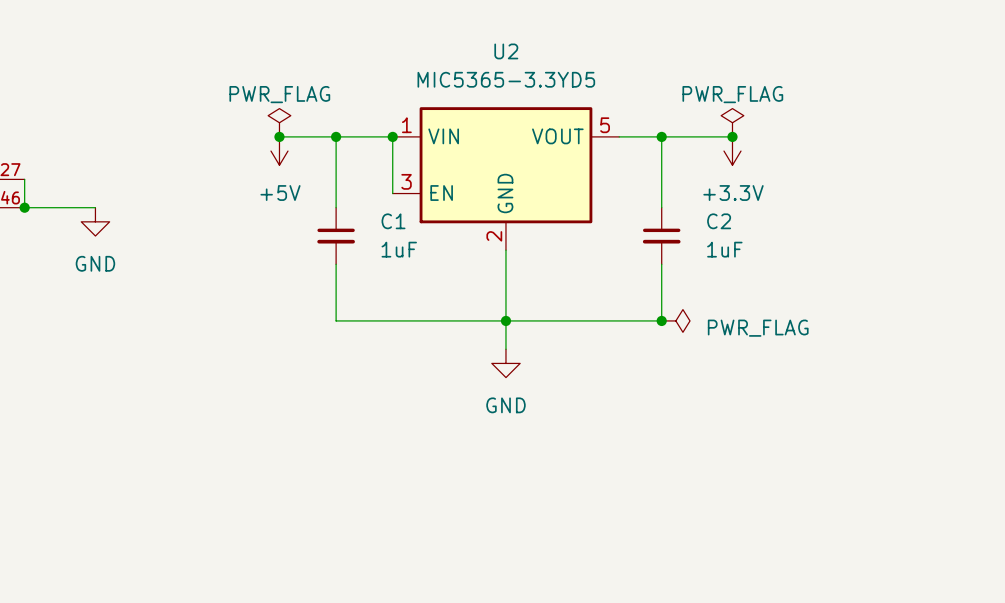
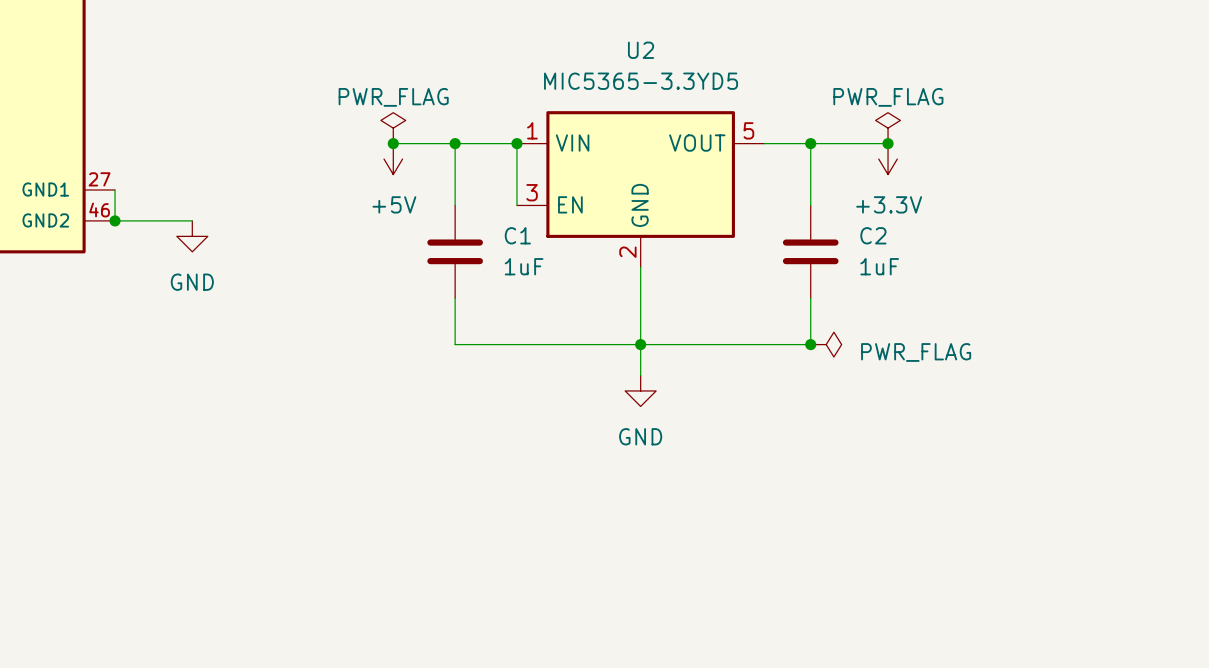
C1 symbol: [317, 207, 355, 265] -> [427, 205, 483, 299]
C2 symbol: [642, 207, 681, 265] -> [782, 205, 839, 299]

